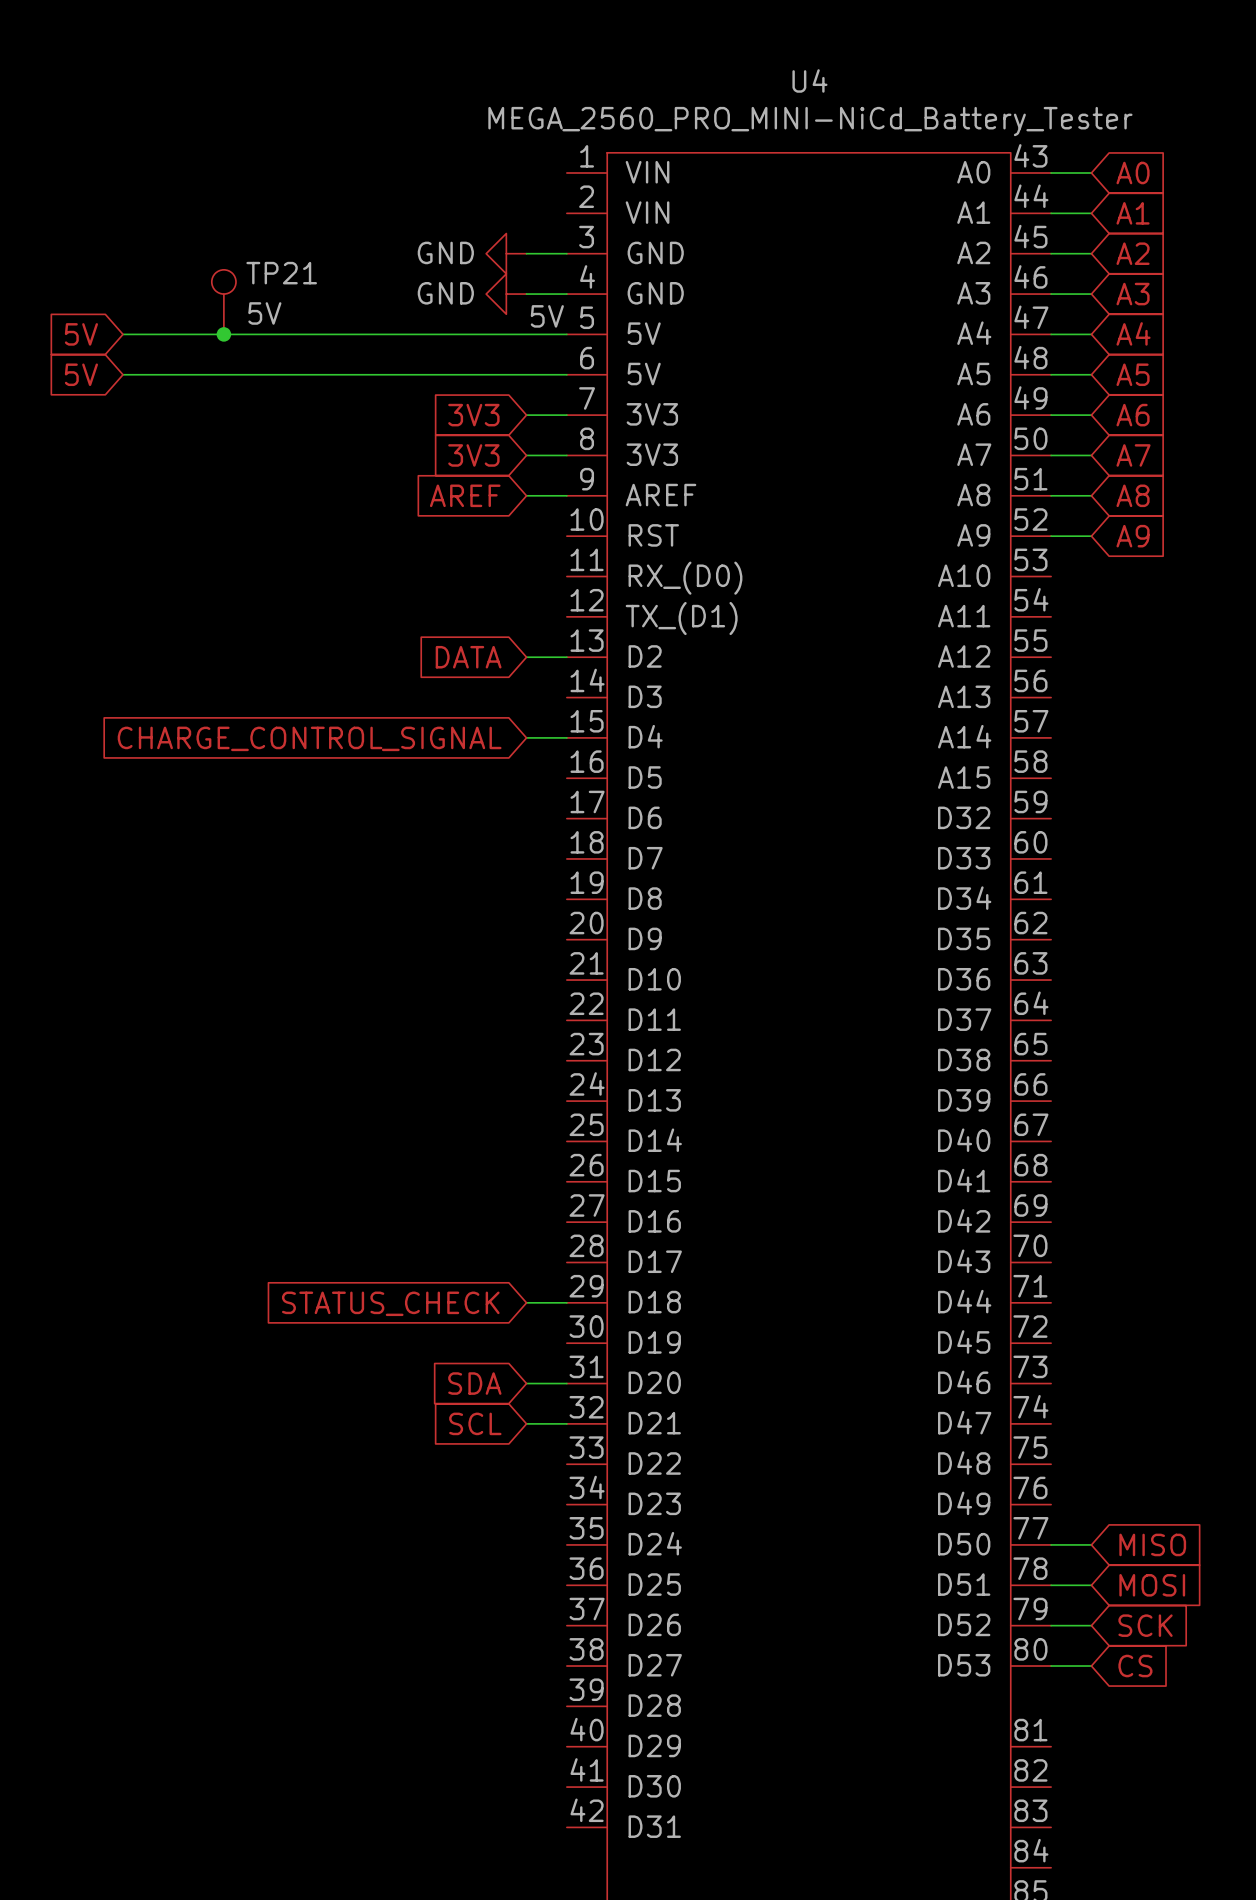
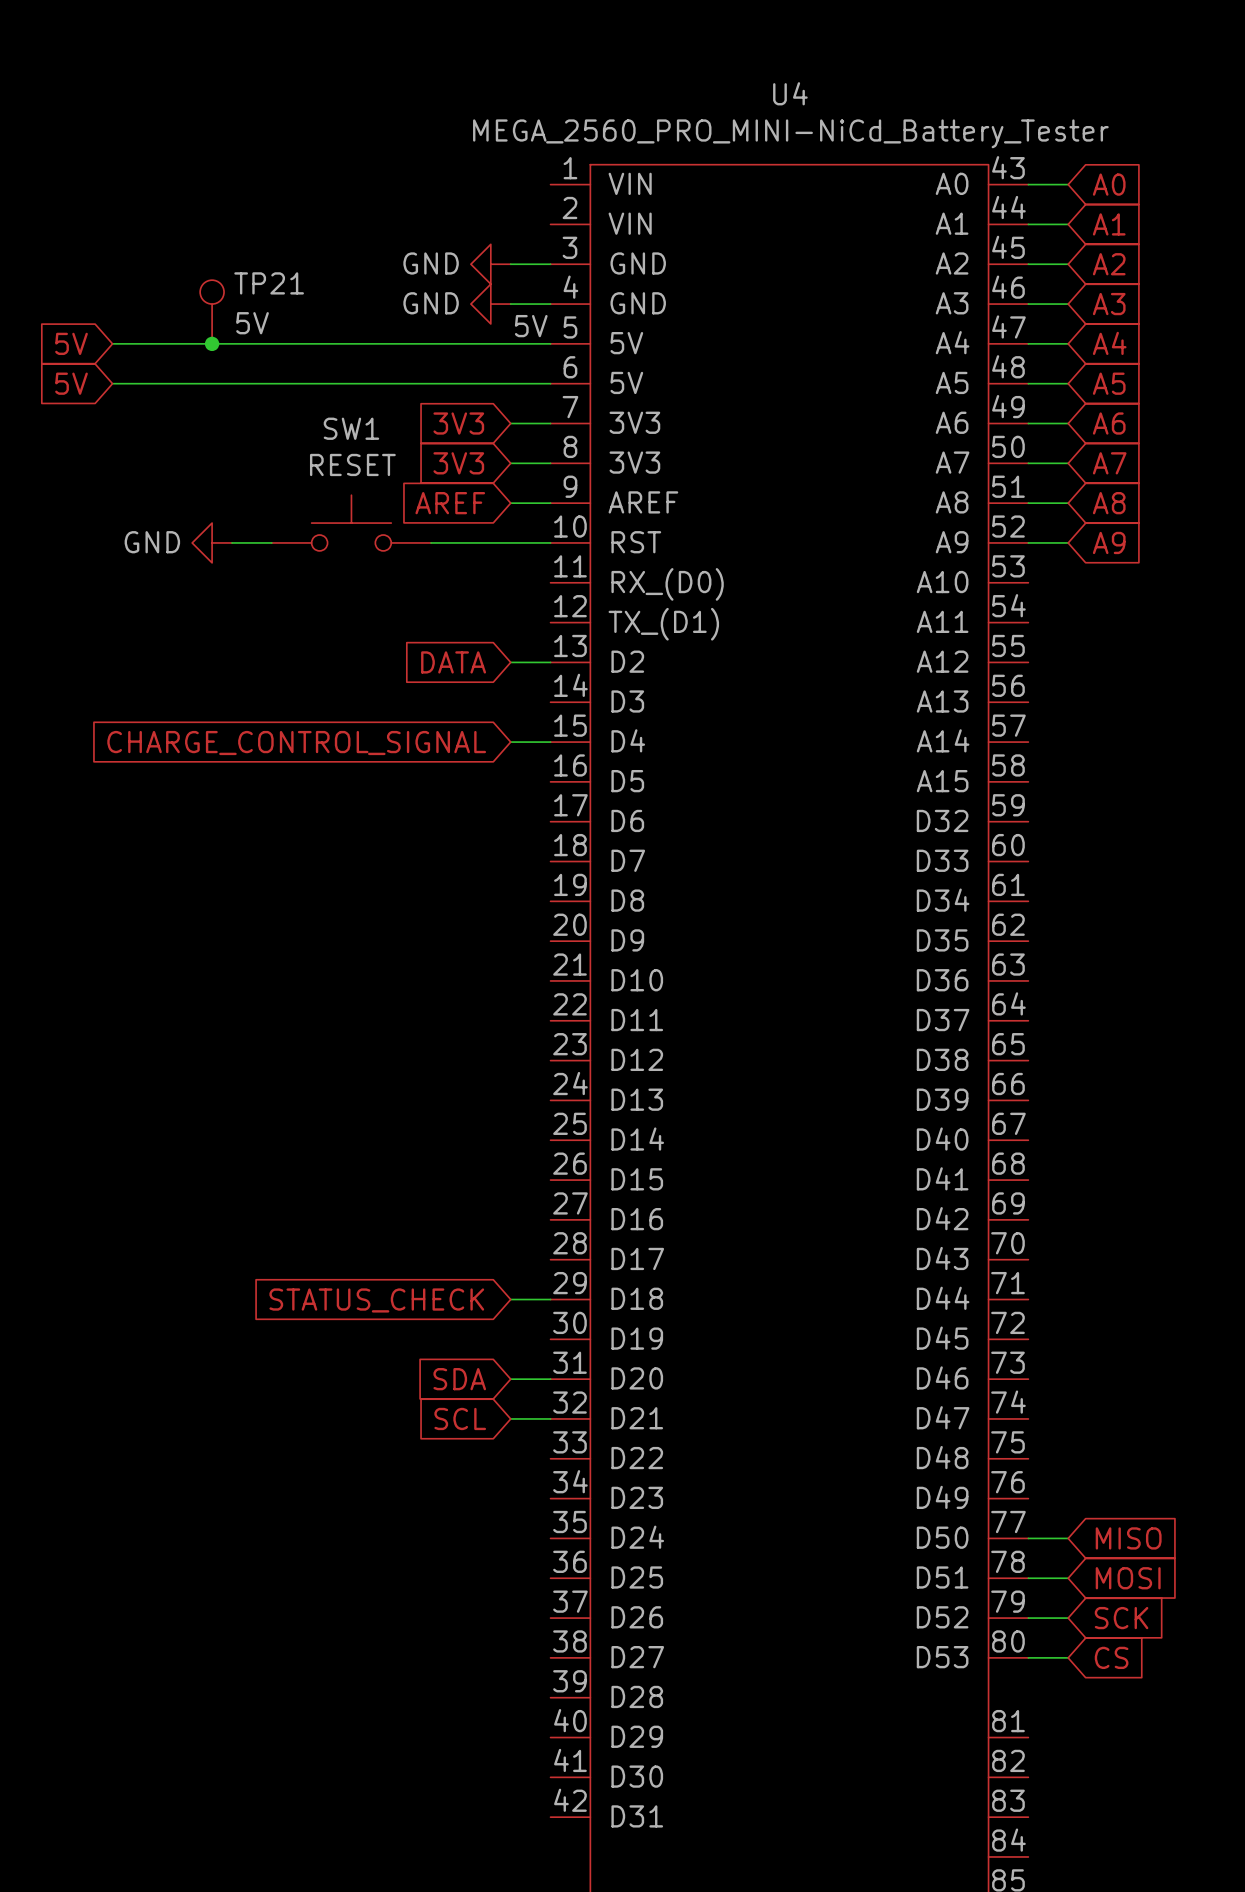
SW1: none -> RESET (351, 523)
power symbol: none -> GND (212, 542)
wire: none -> (232, 542) (271, 542)
wire: none -> (431, 542) (550, 542)

